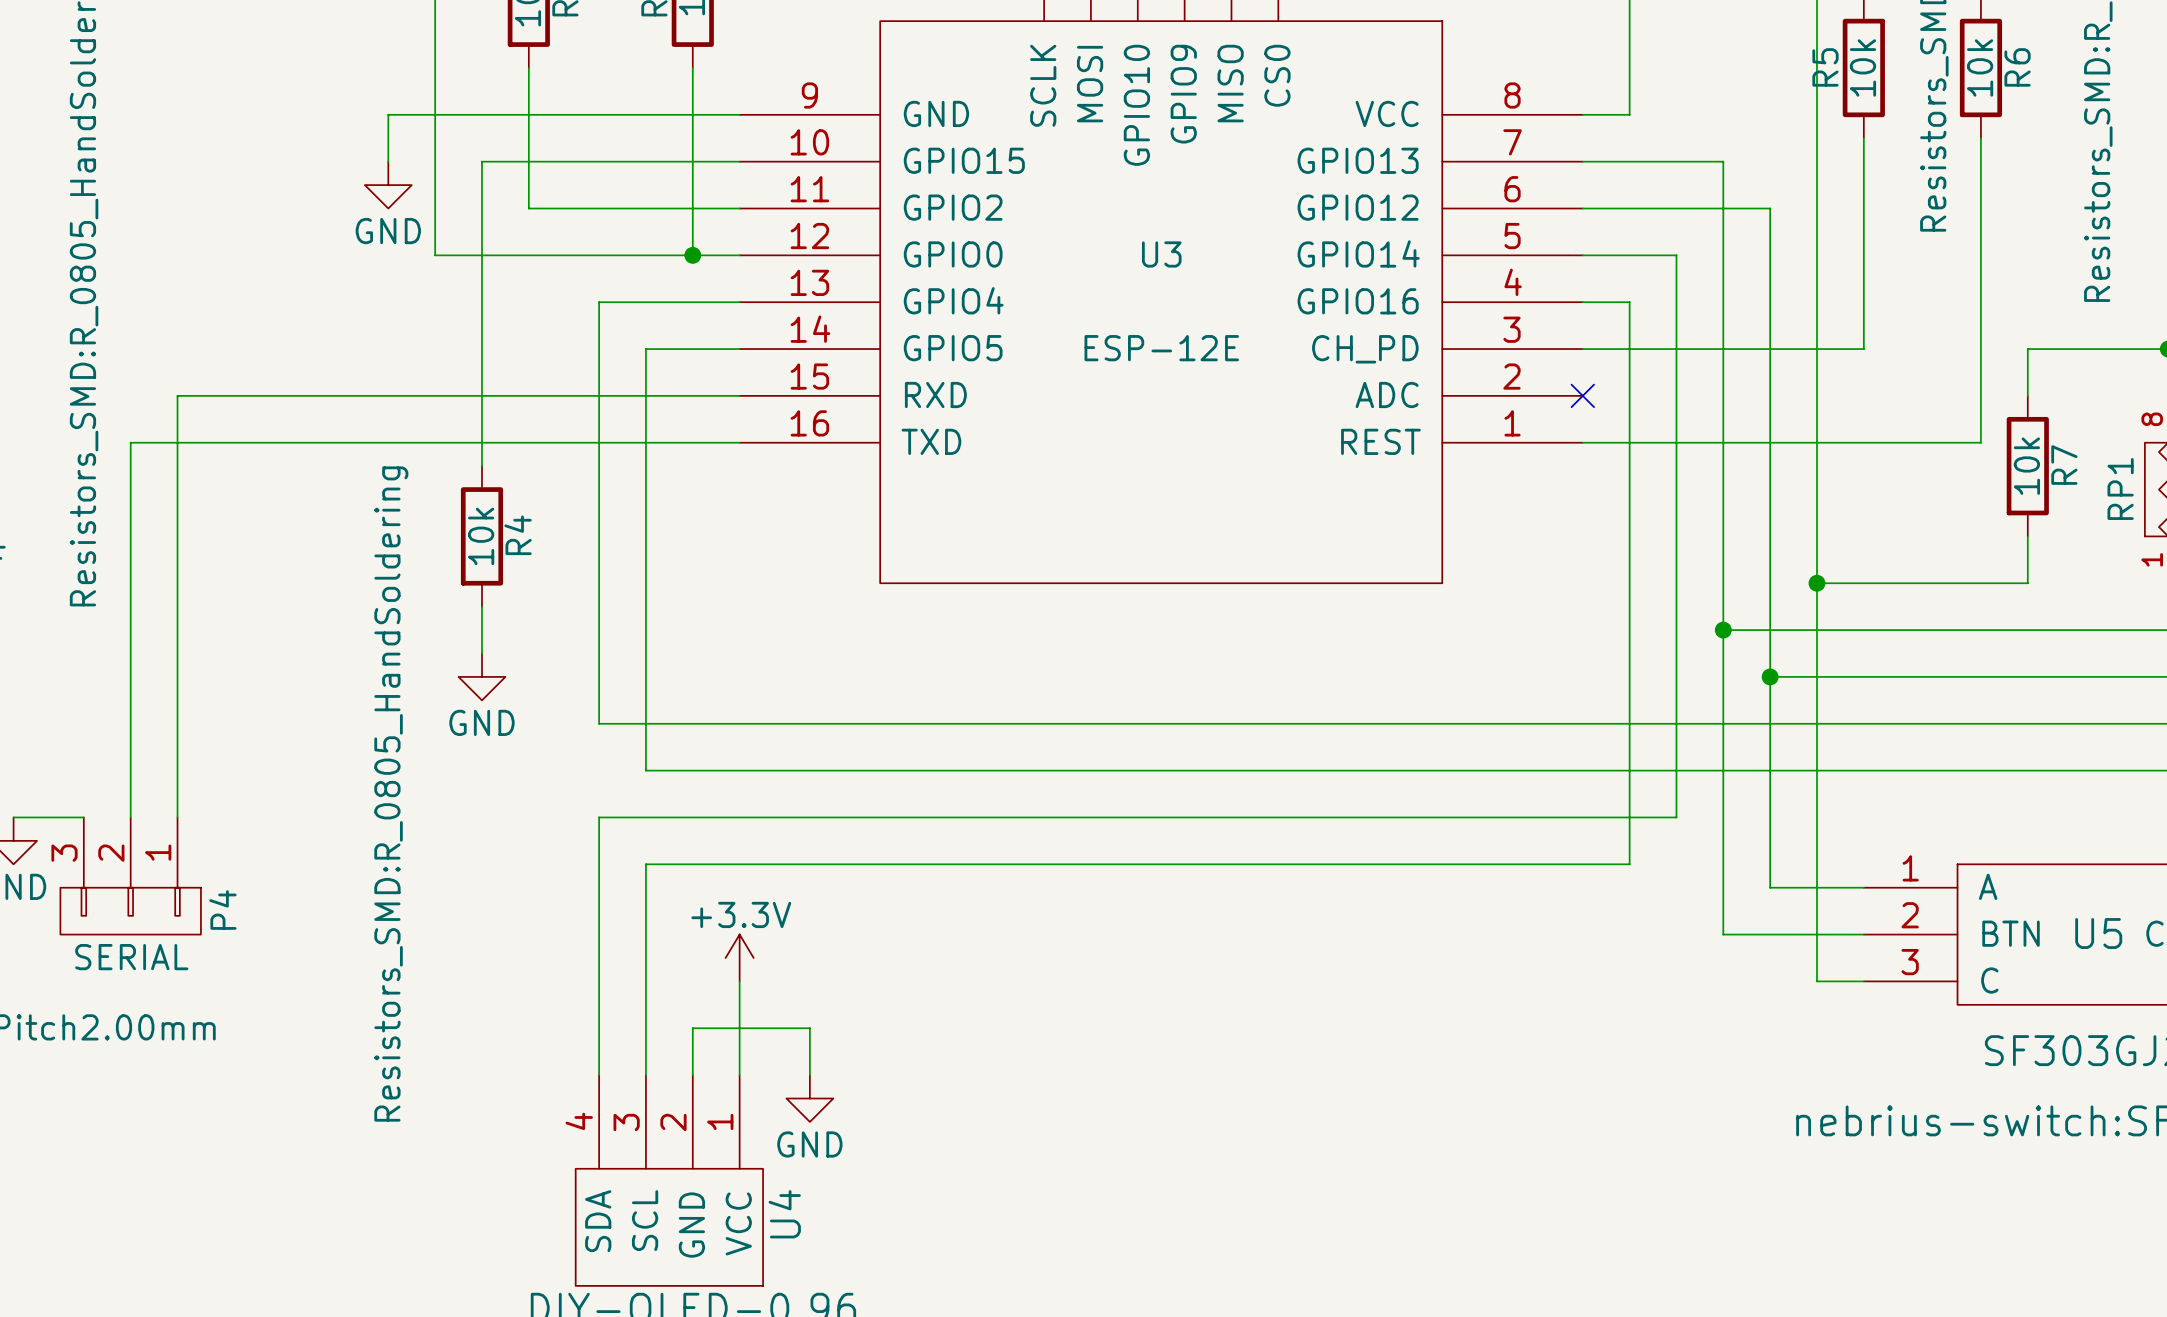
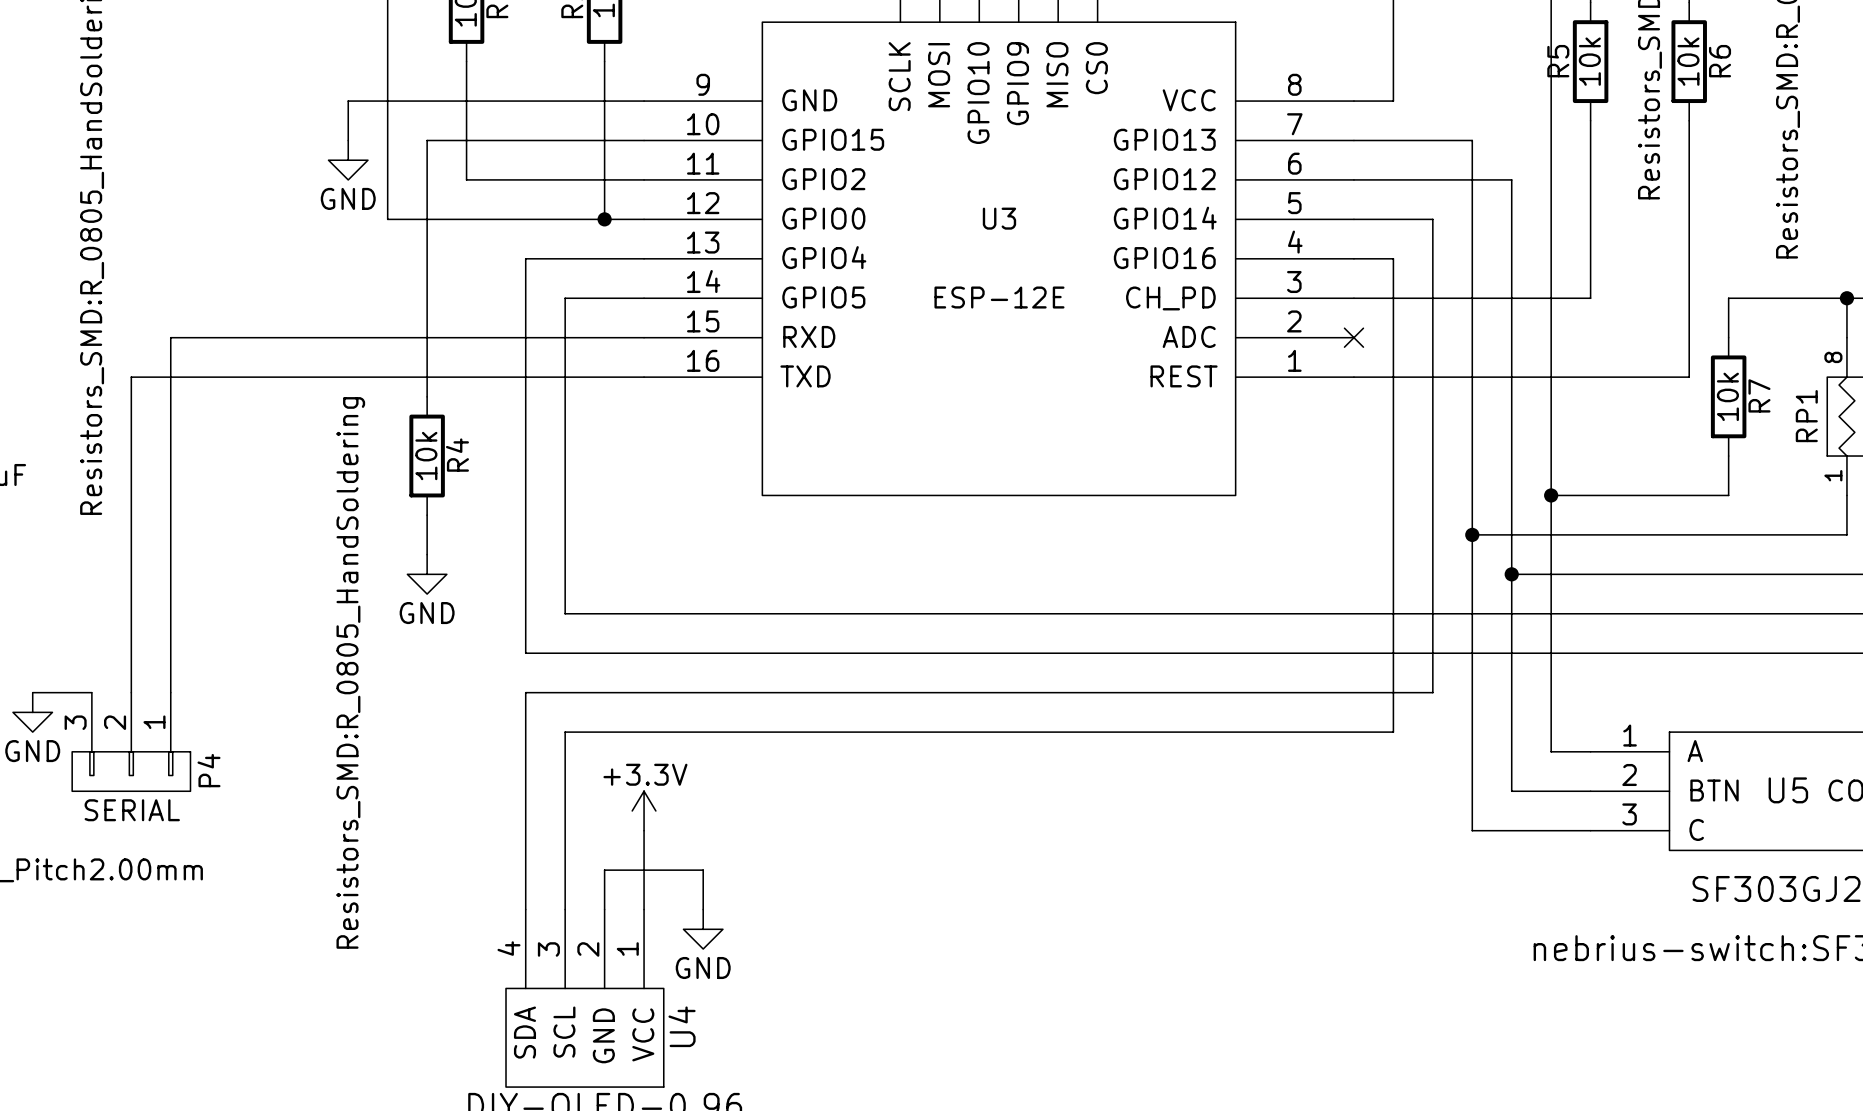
wire: (599, 723) (645, 723) (645, 770) -> (525, 613) (525, 653) (565, 653)
wire: (1770, 887) (1817, 887) (1817, 981) -> (1511, 751) (1511, 791)
wire: (1723, 934) (1770, 934) -> (1472, 791) (1472, 830) (1551, 830)

